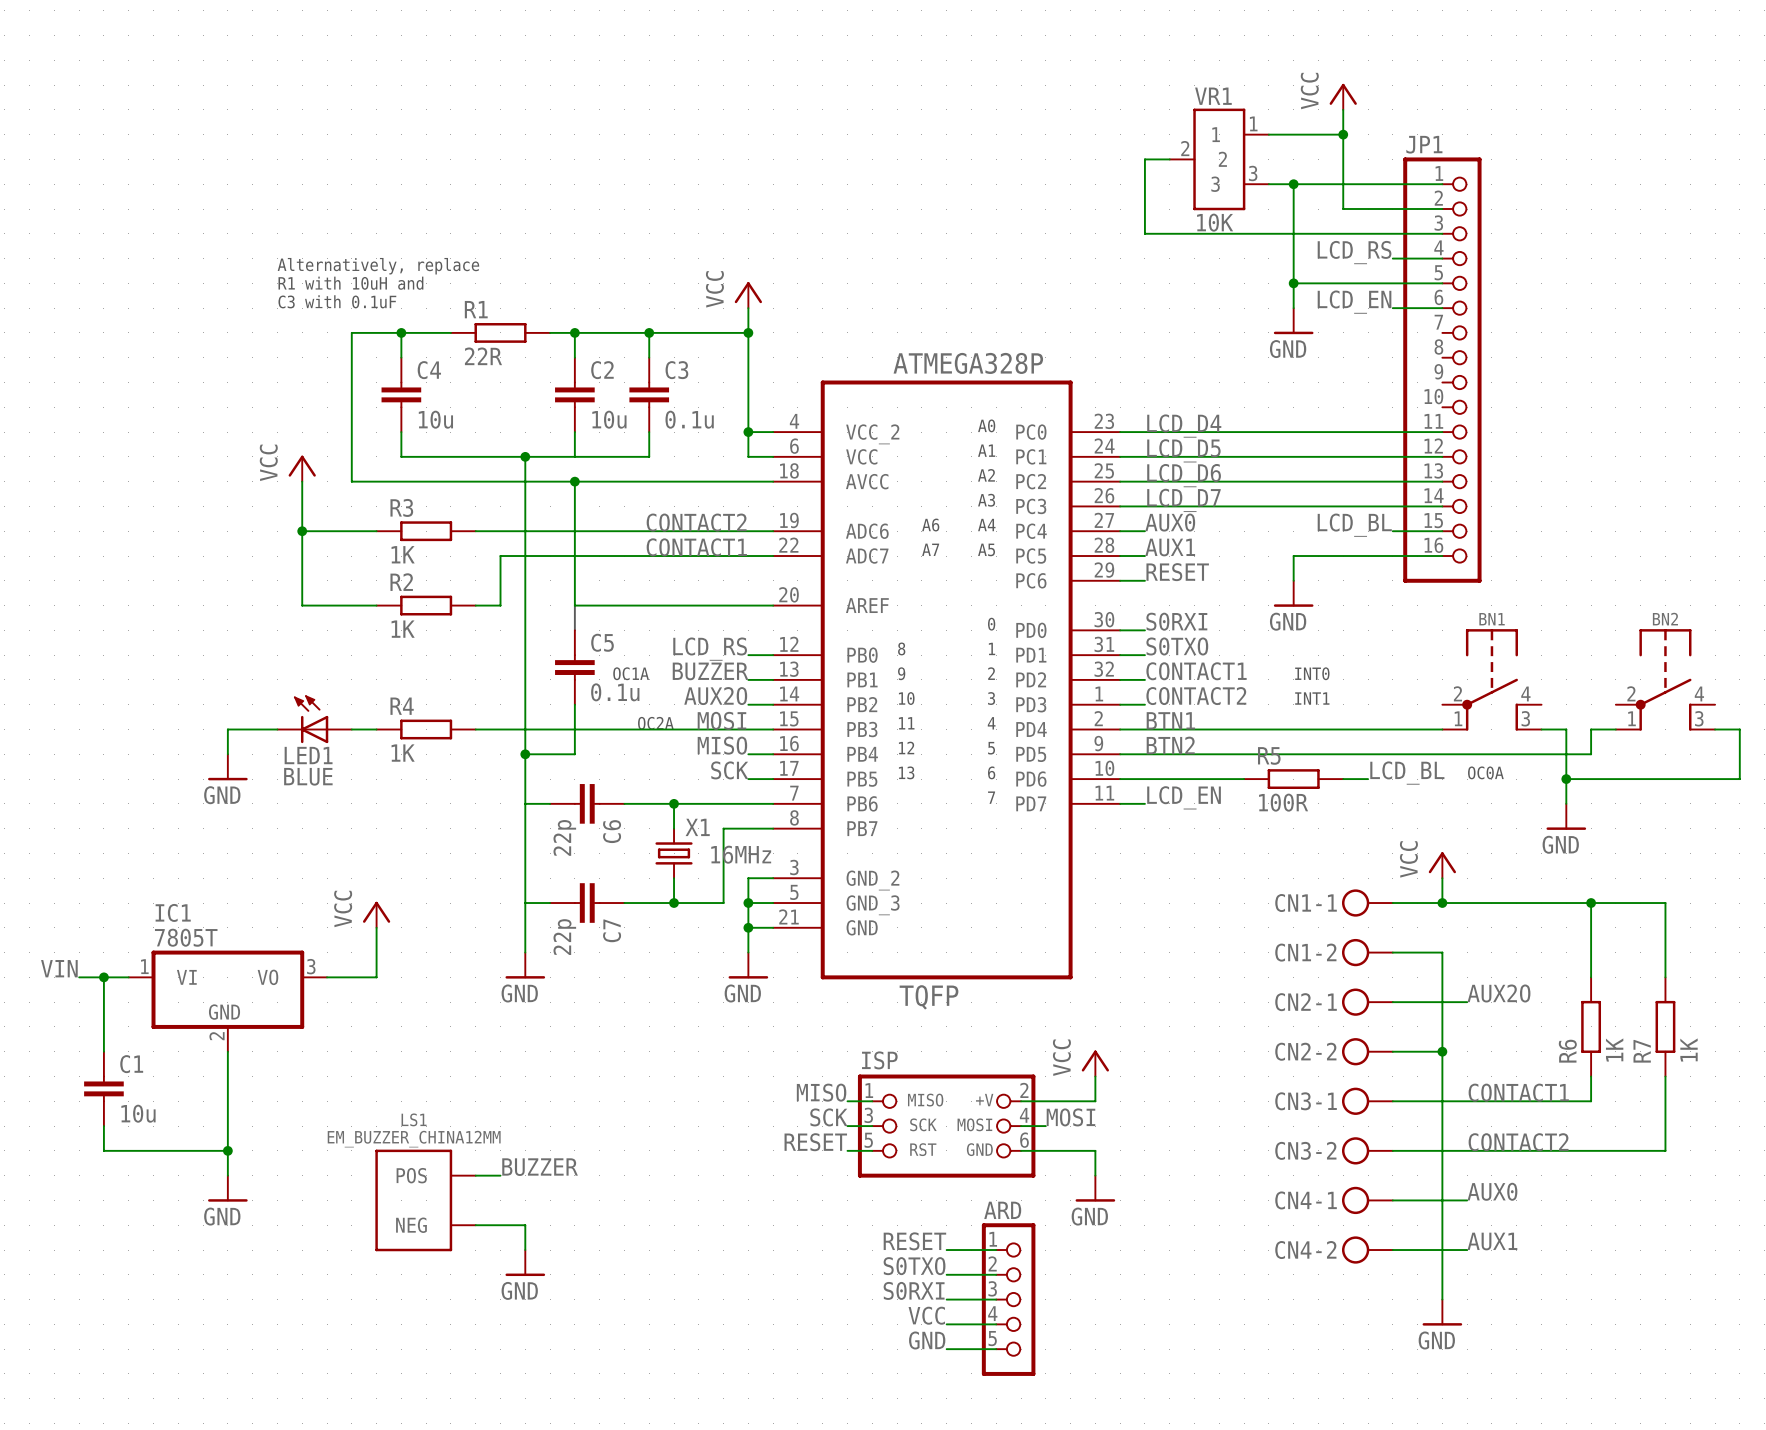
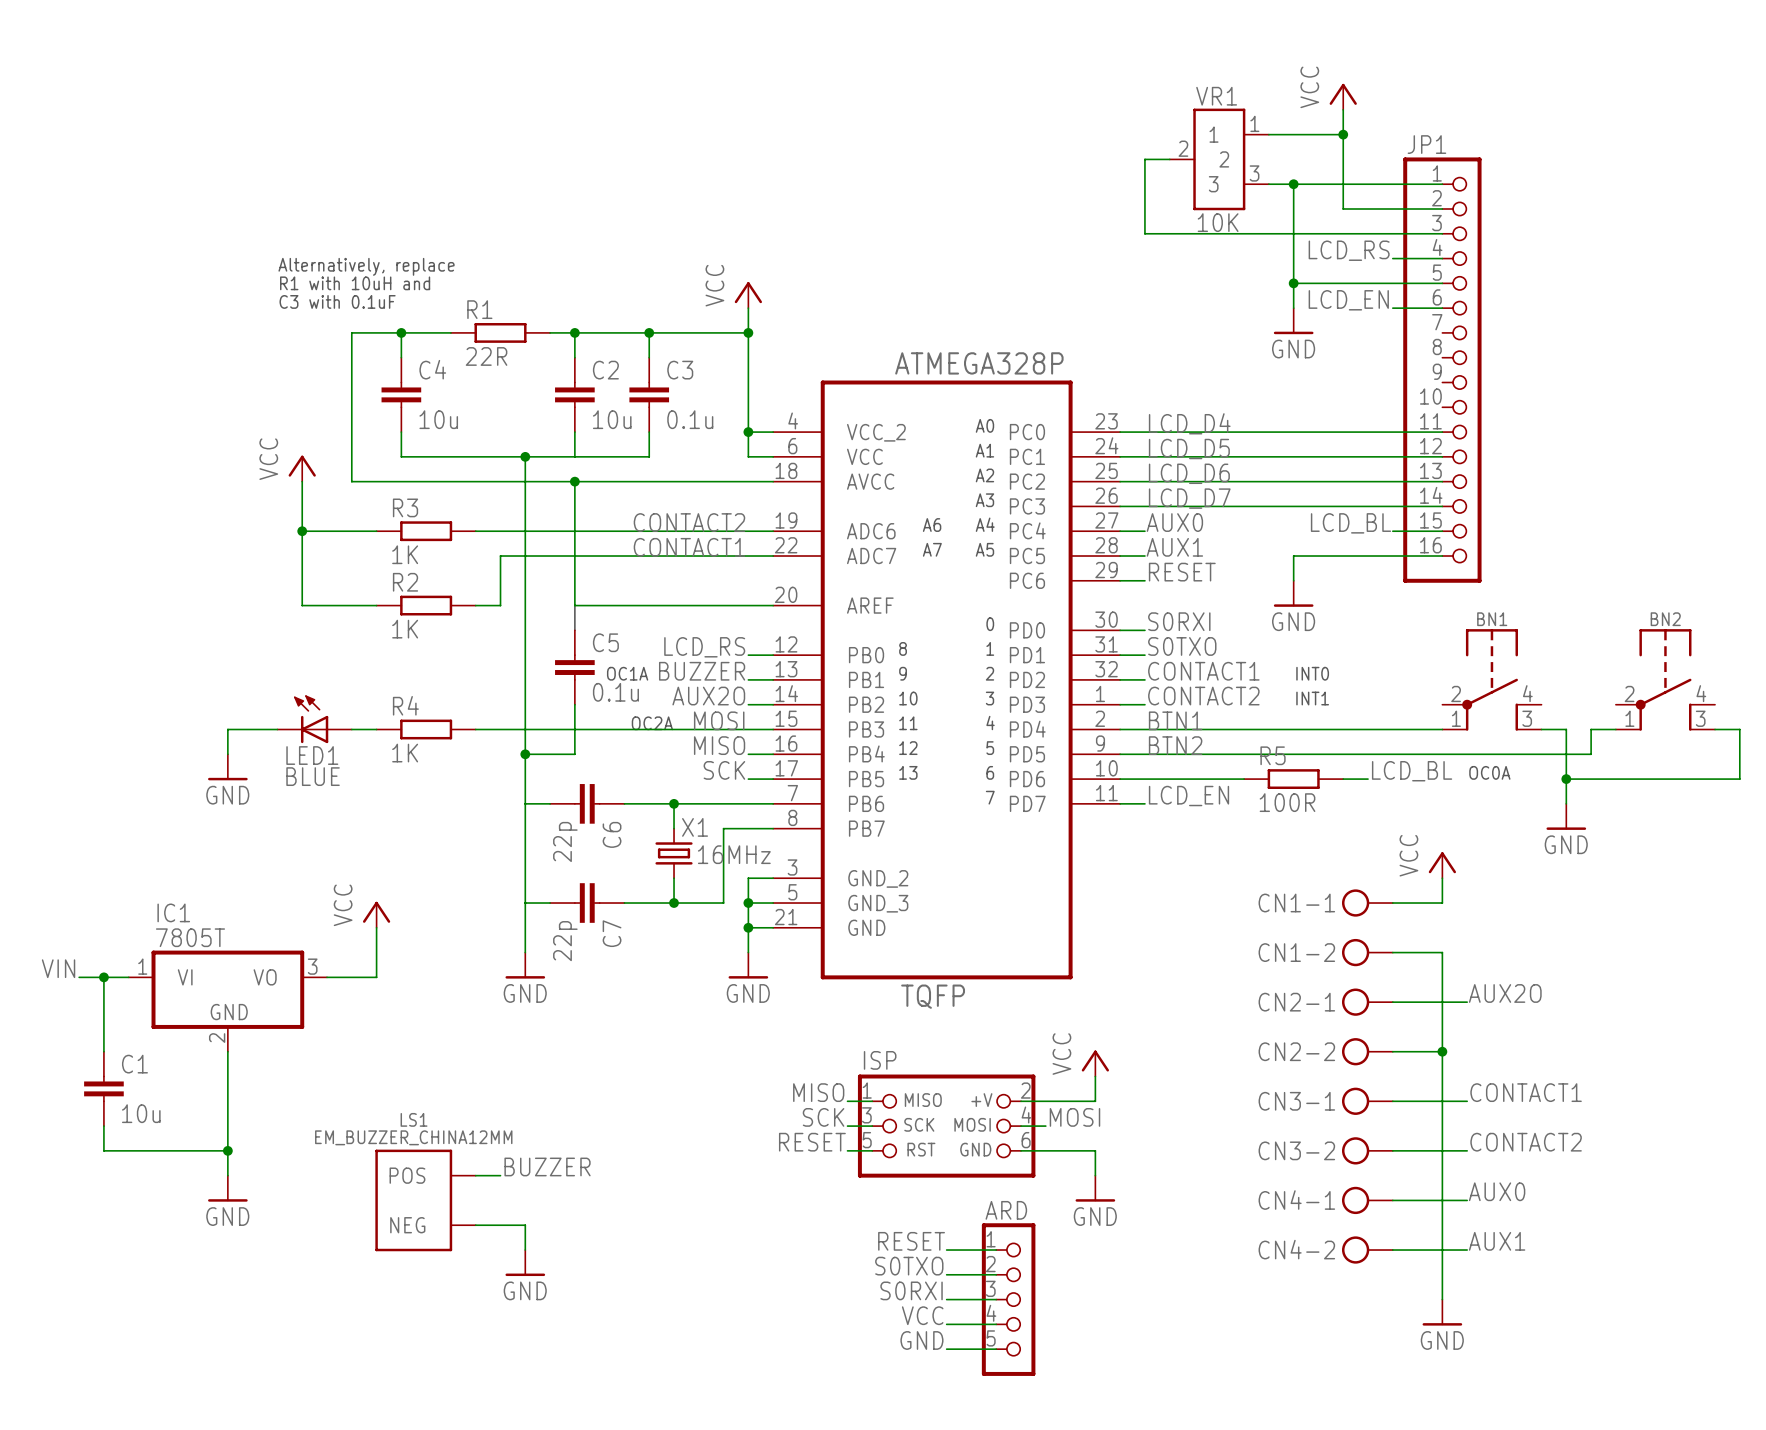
wire: (1442, 903) (1665, 903) (1665, 977) -> none
junction: (1442, 903) -> none
wire: (1591, 903) (1591, 977) -> none
junction: (1591, 903) -> none
R6: 1K (1591, 1026) -> none
R7: 1K (1665, 1026) -> none
wire: (1591, 1076) (1591, 1101) (1467, 1101) -> none
wire: (1665, 1076) (1665, 1150) (1467, 1150) -> none

